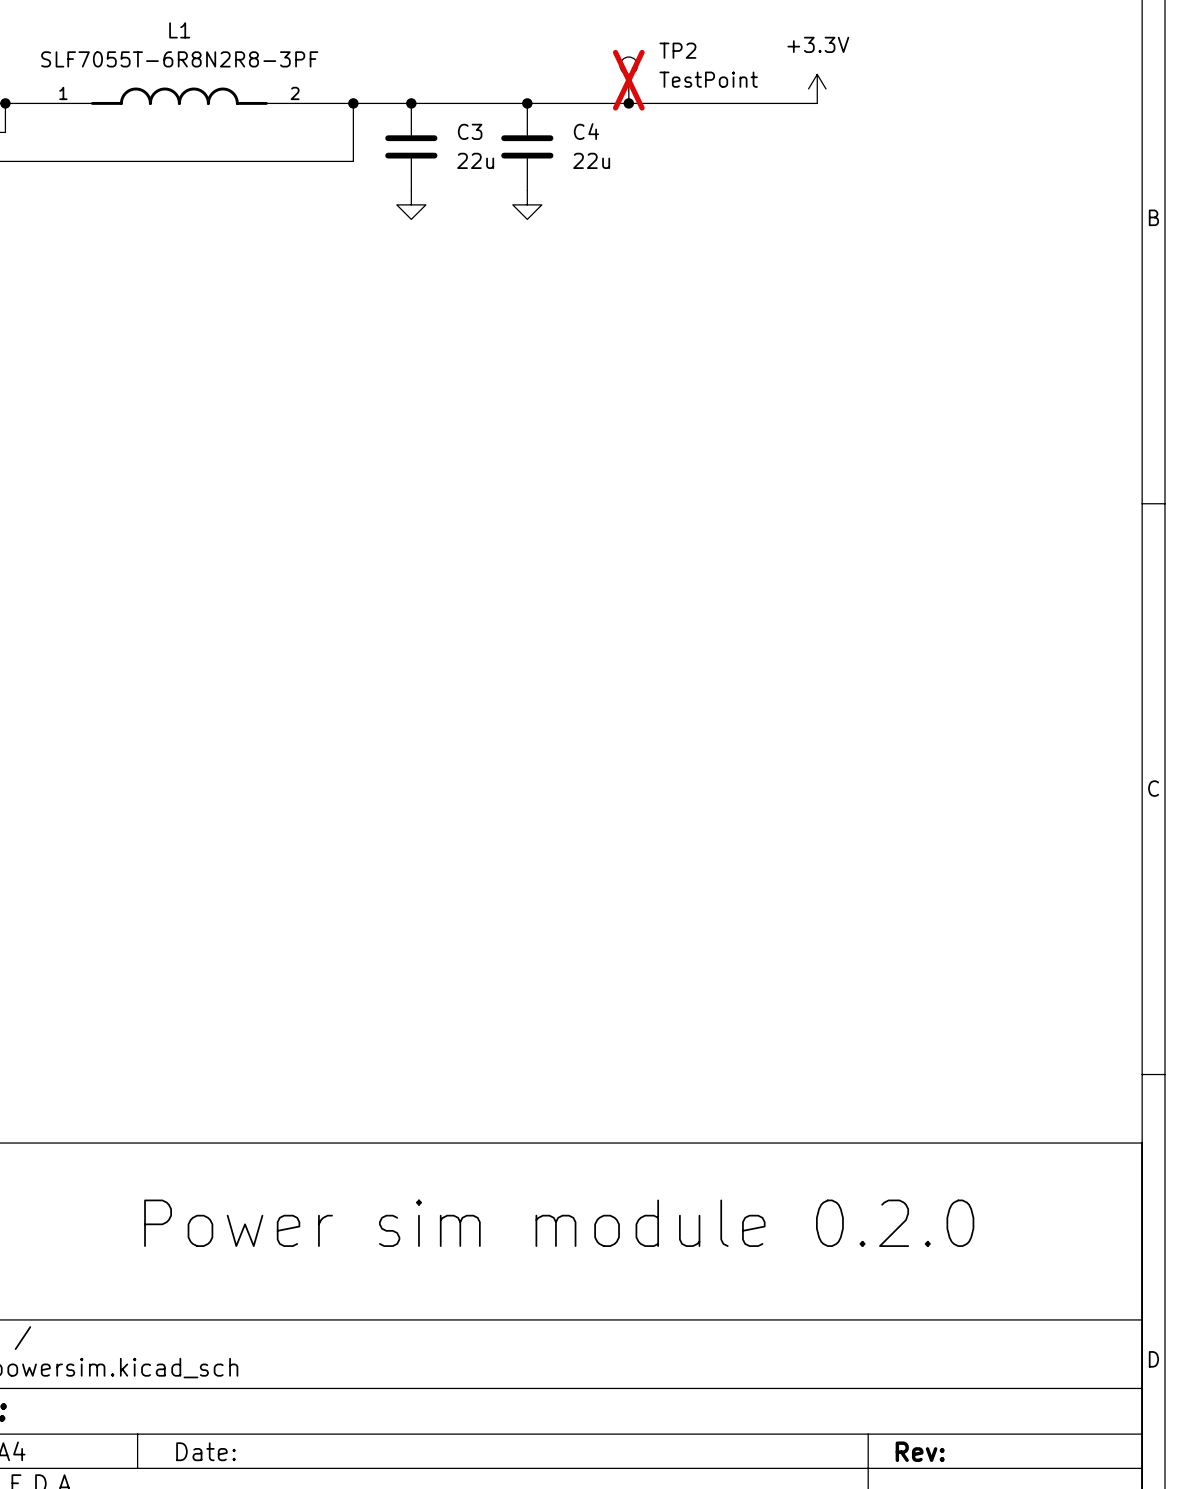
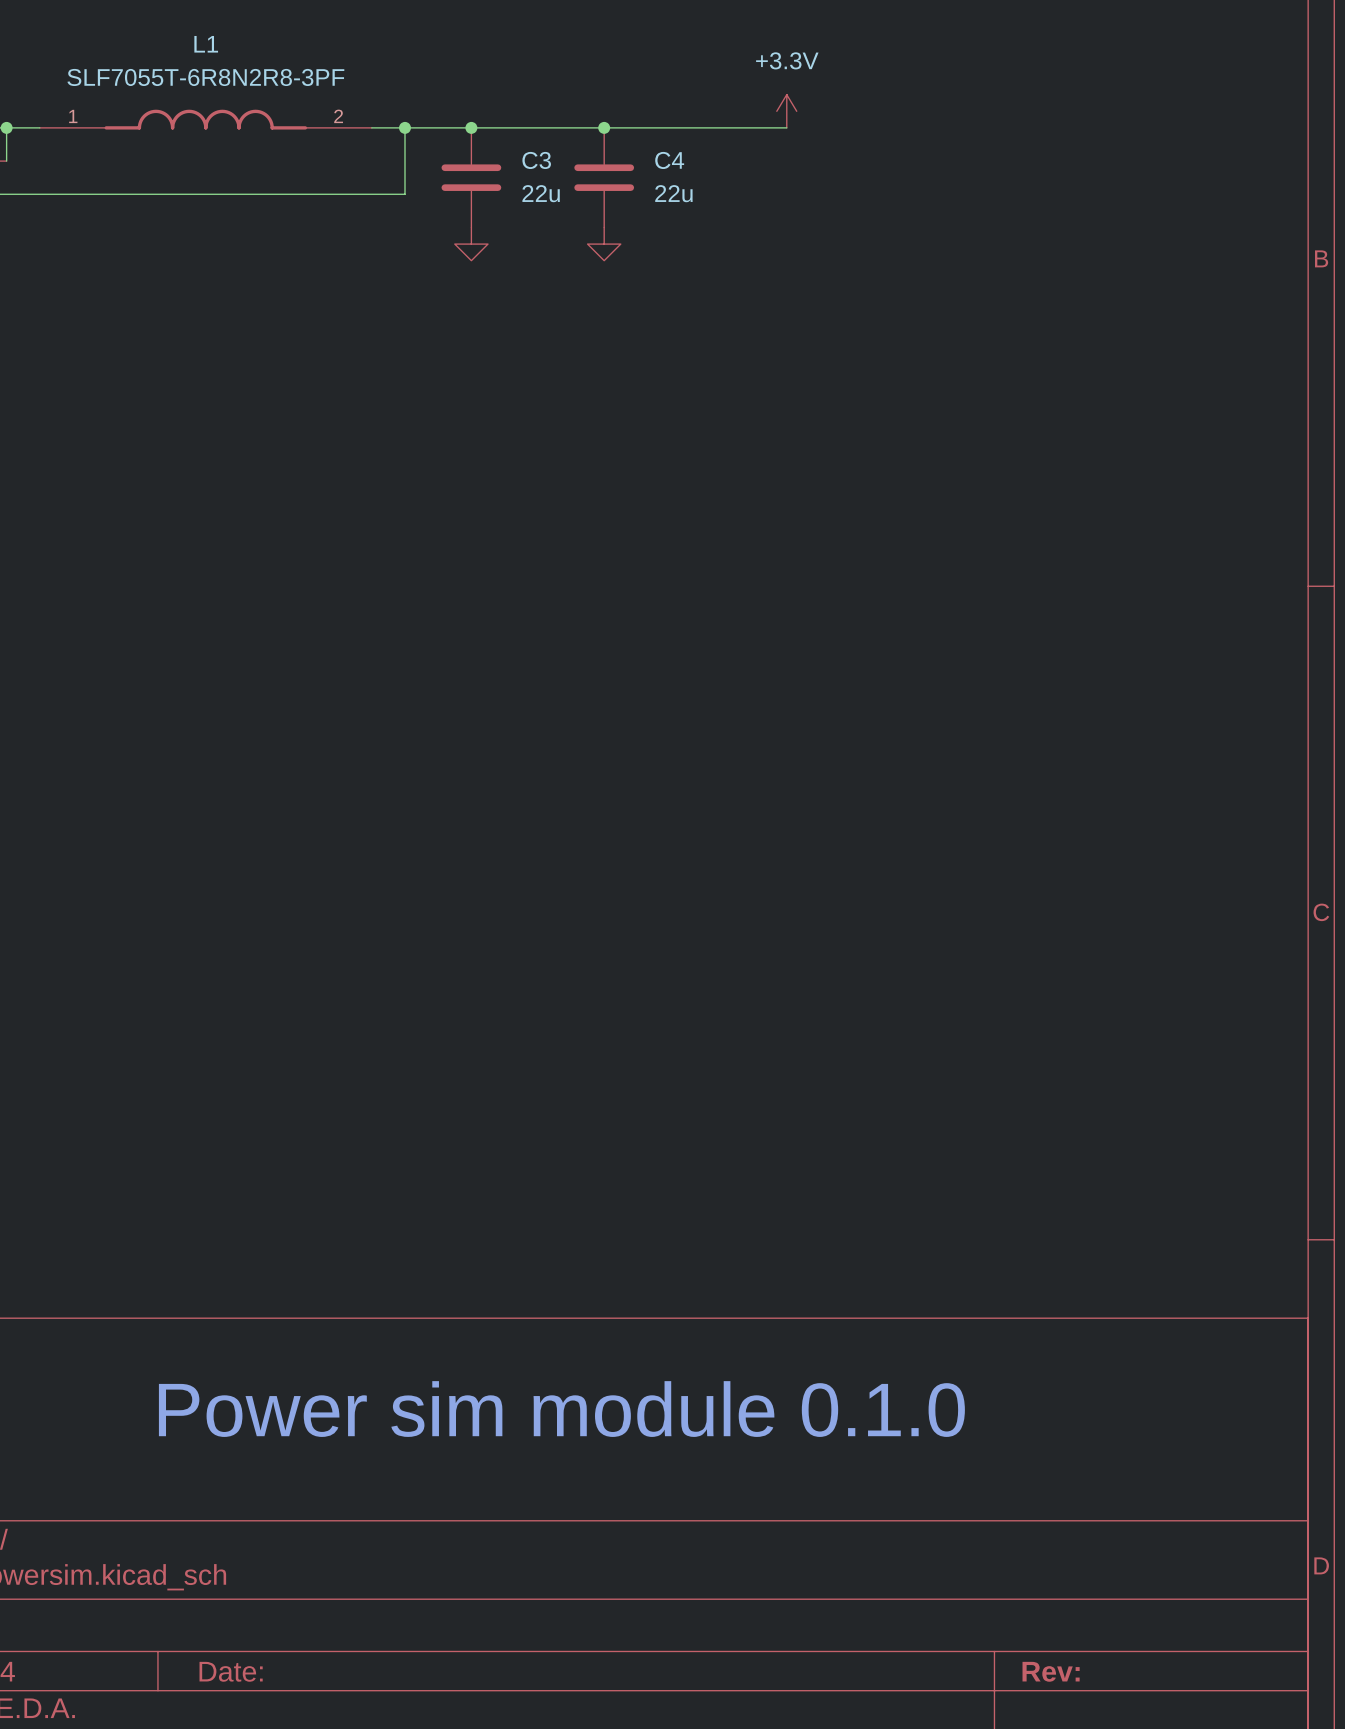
TP2: TestPoint (628, 80) -> none
power symbol position: +3.3V (817, 88) -> +3.3V (786, 111)
junction: (628, 103) -> none
wire: (686, 103) (817, 103) -> none
text: Power sim module 0.2.0 (559, 1223) -> Power sim module 0.1.0 (561, 1409)

